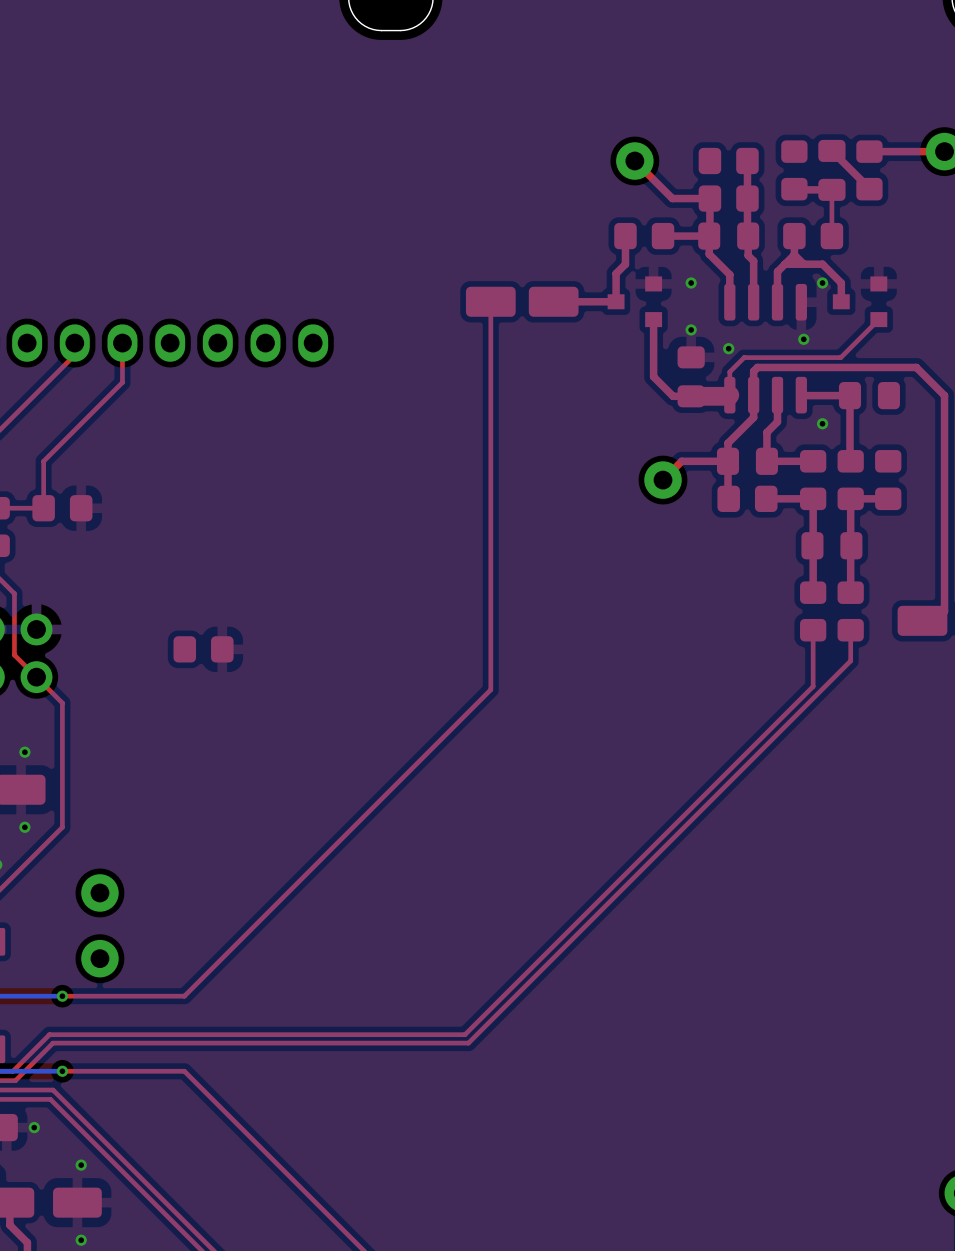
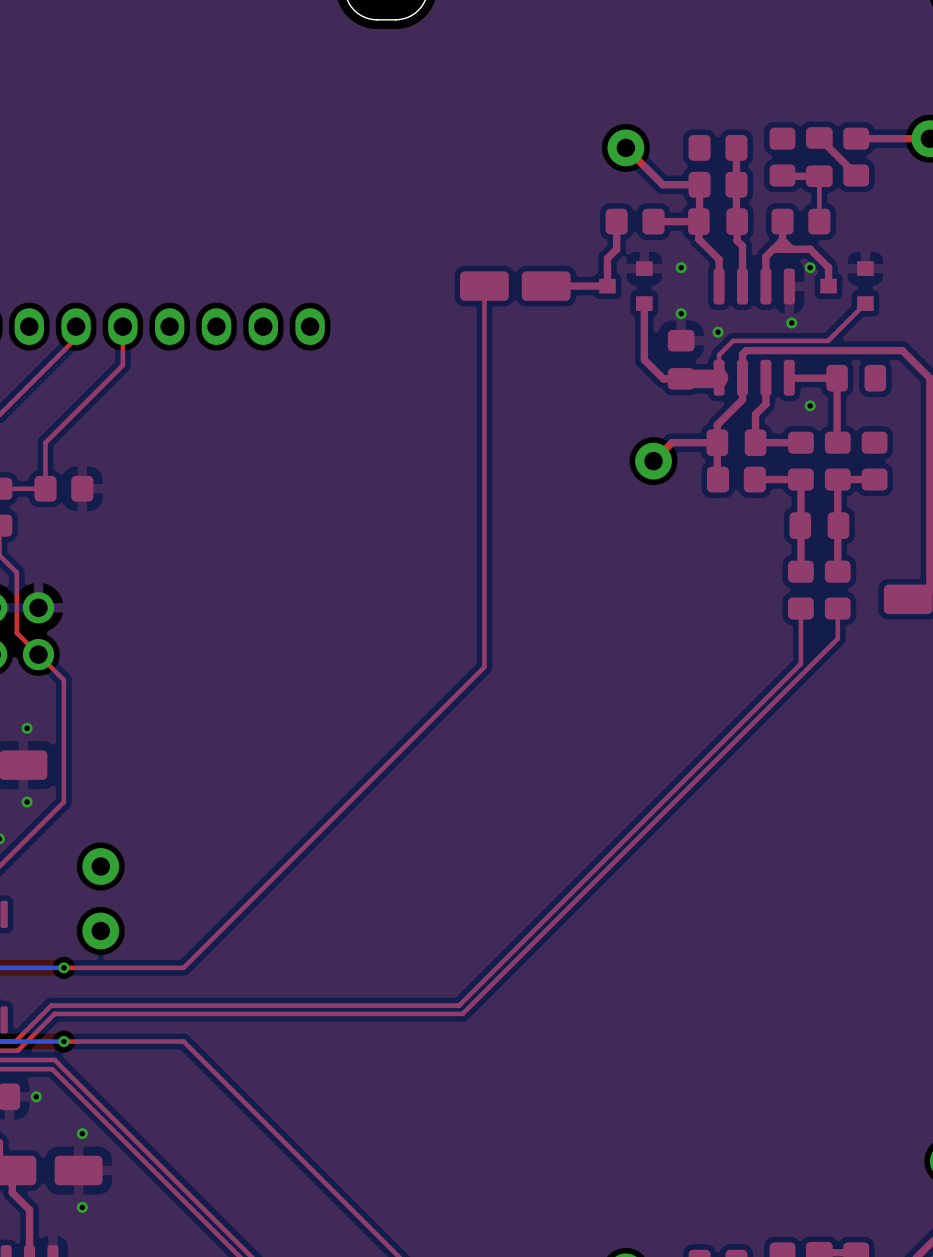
part: (203, 649) -> none

